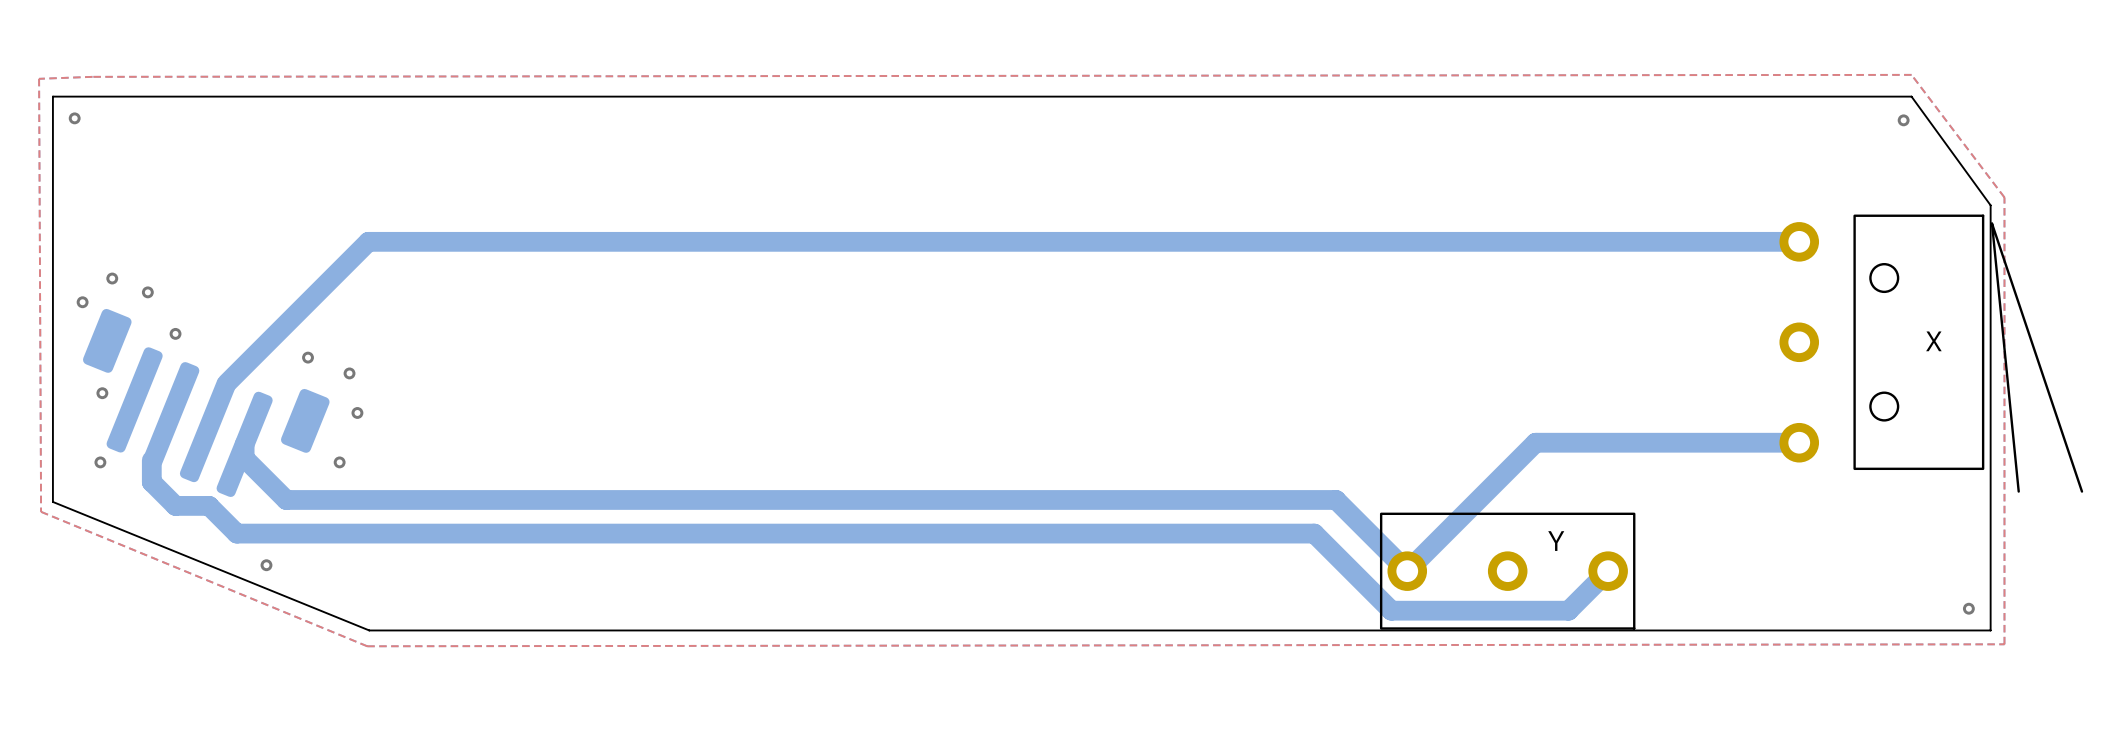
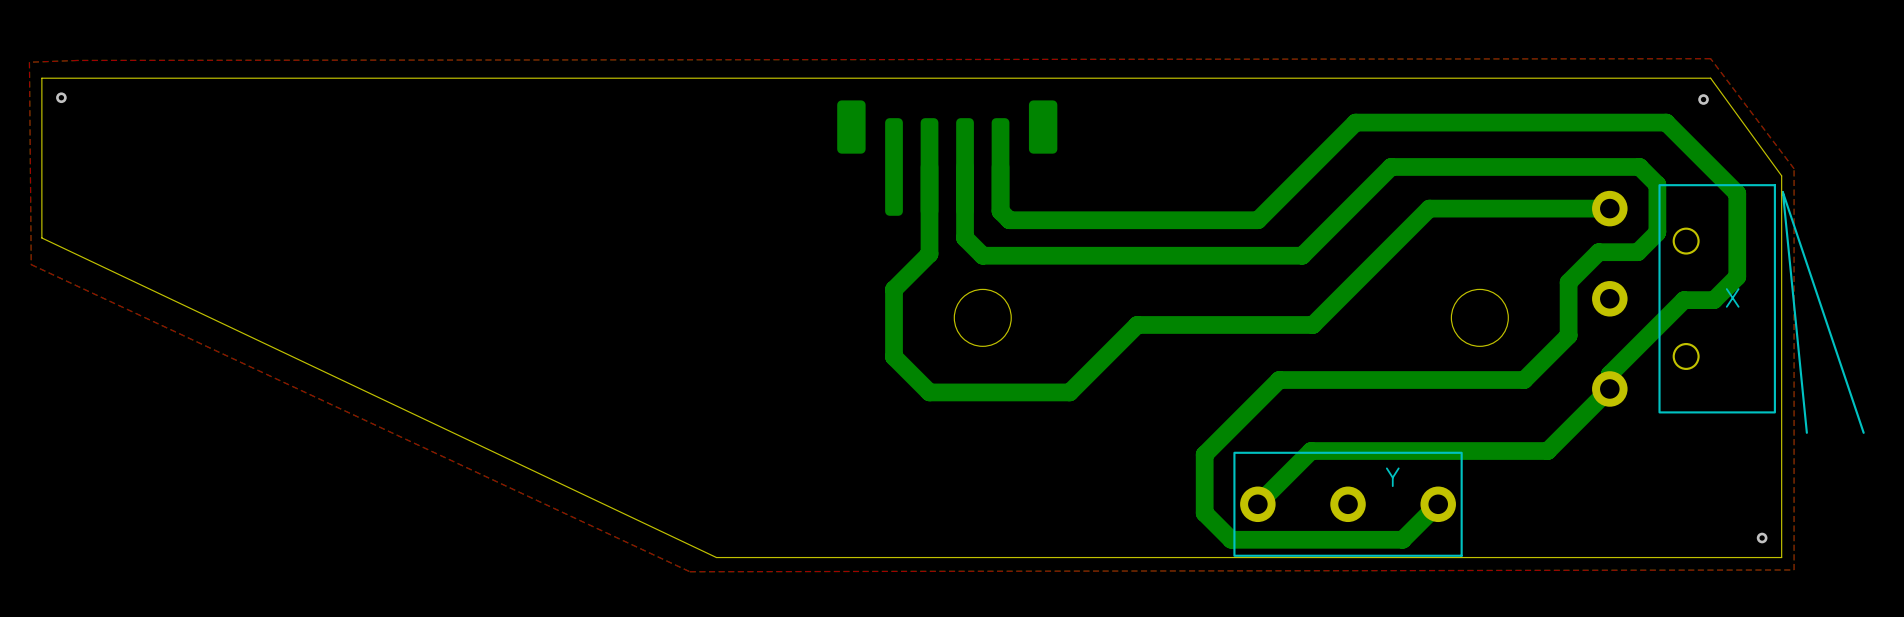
top zone outline: (39, 78) (41, 511) (367, 646) (2004, 644) -> (29, 62) (31, 264) (689, 571) (1794, 569)
part: none -> (947, 158)
bottom track: (1598, 241) (368, 241) (226, 383) -> (1429, 208) (1312, 324) (1137, 324) (1069, 392) (929, 392) (894, 356) (894, 289) (929, 253) (929, 166)
board edge: (52, 274) (52, 501) (369, 630) (804, 630) -> (41, 237) (716, 557)
via: (112, 278) -> none
via: (147, 292) -> none
via: (82, 302) -> none
round board edge: none -> [953, 288, 1012, 347]
round board edge: none -> [1450, 288, 1509, 347]
via: (175, 333) -> none
via: (308, 357) -> none
via: (349, 373) -> none
via: (102, 393) -> none
part: (206, 402) -> none
via: (357, 412) -> none
bottom track: (1799, 442) (1535, 442) (1466, 511) -> (1000, 166) (1000, 211) (1009, 220) (1257, 220) (1355, 122) (1666, 122) (1737, 193) (1737, 276) (1714, 300) (1684, 300) (1609, 374) (1609, 388) (1547, 451) (1311, 451)
bottom track: (244, 444) (244, 458) (286, 499) (1336, 499) (1407, 571) -> none
bottom track: (151, 460) (151, 482) (175, 505) (209, 505) (236, 533) (1314, 533) (1391, 610) -> (965, 166) (965, 237) (982, 255) (1302, 255) (1391, 166) (1639, 166) (1657, 184) (1656, 233) (1637, 252) (1598, 252) (1568, 282) (1568, 335) (1524, 380) (1279, 380) (1204, 454) (1204, 513) (1231, 539) (1243, 539)
via: (100, 462) -> none
via: (339, 462) -> none
via: (266, 565) -> none

